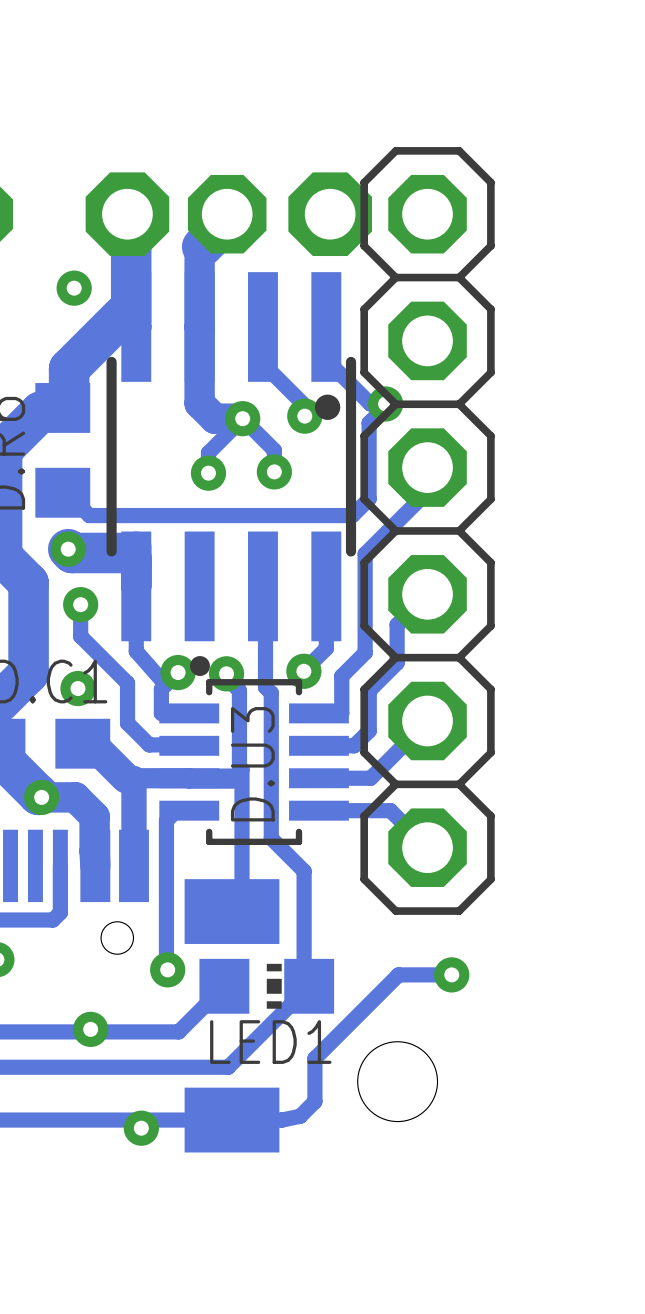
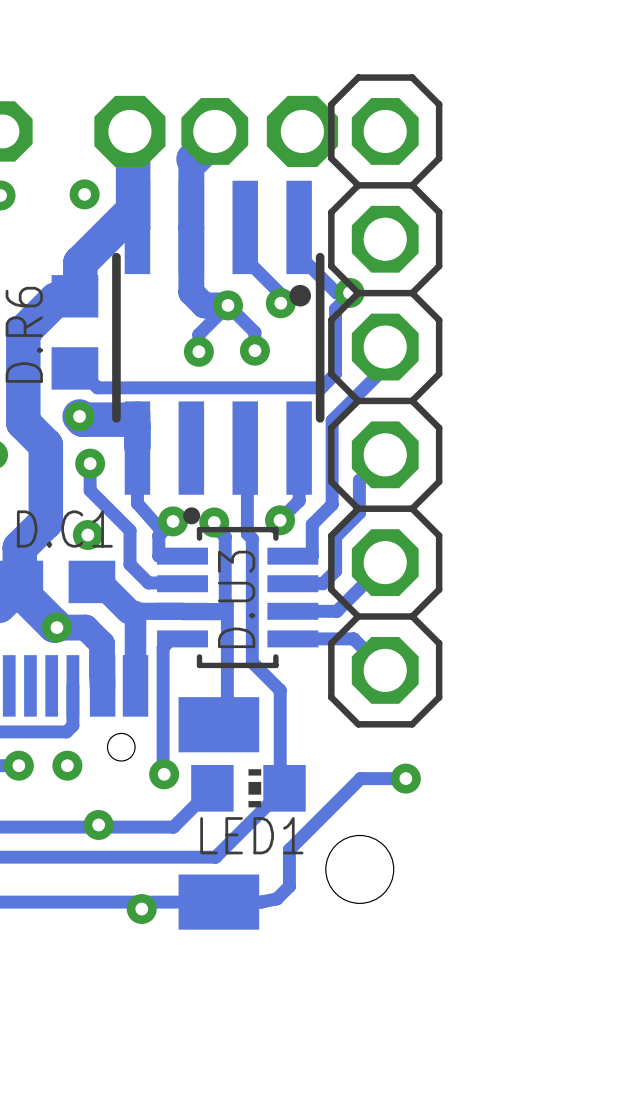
via: none -> (67, 765)

